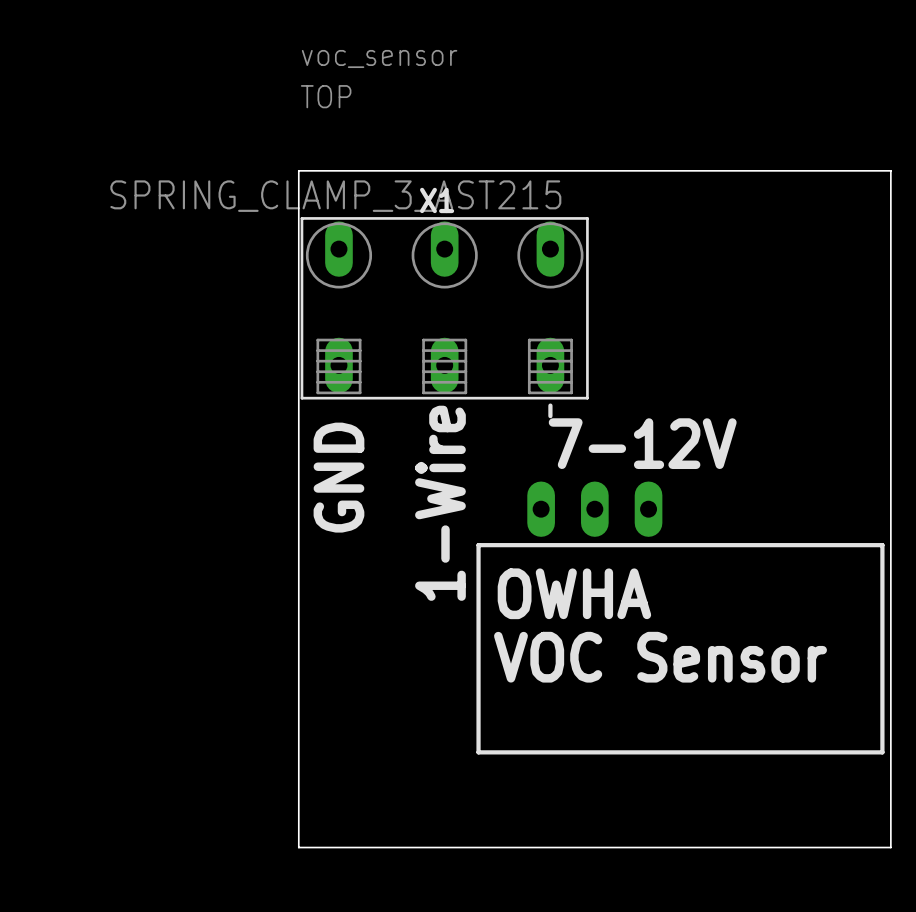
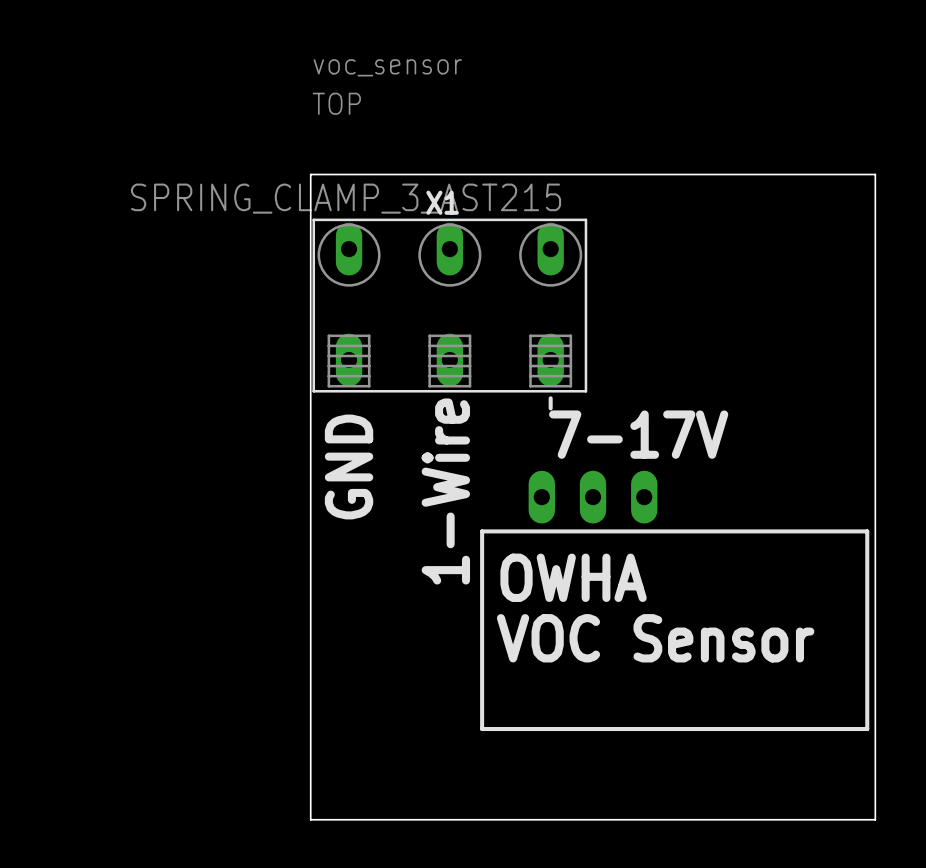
text: 7-12V (642, 443) -> 7-17V (638, 434)

